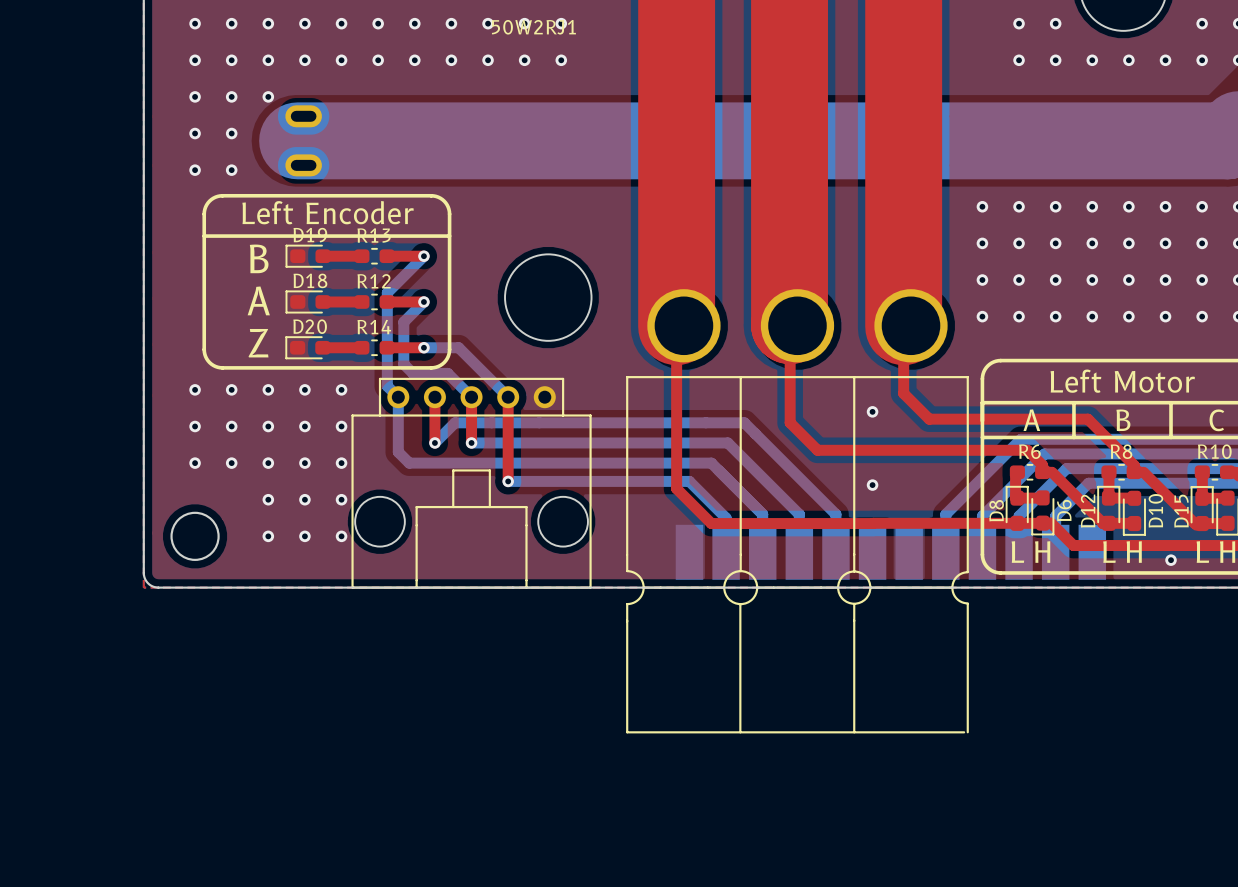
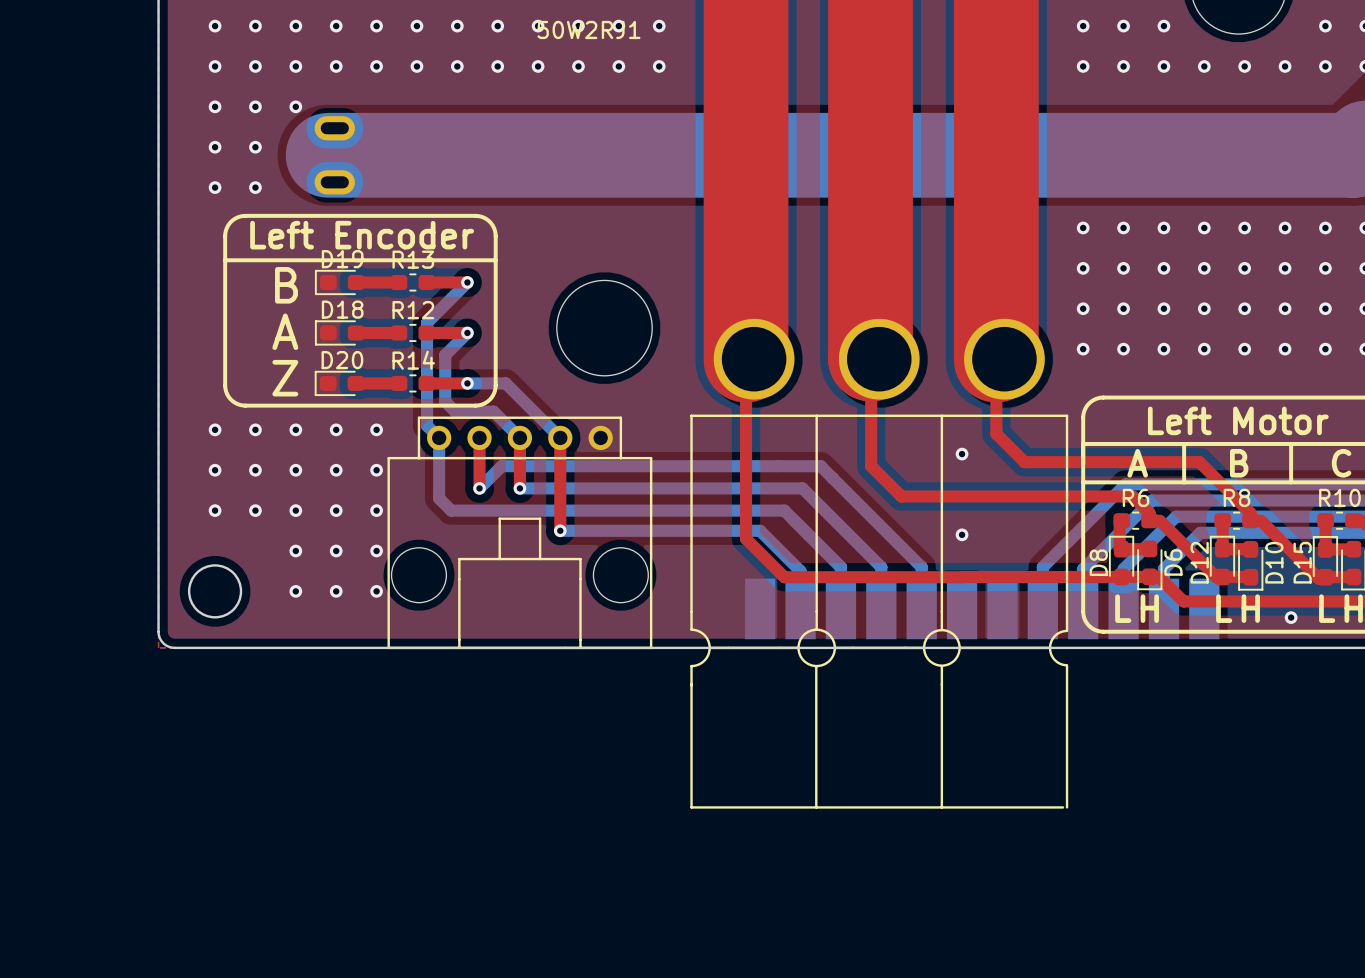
via: none -> (659, 26)
via: none -> (1083, 26)
via: none -> (659, 66)
via: none -> (1083, 66)

